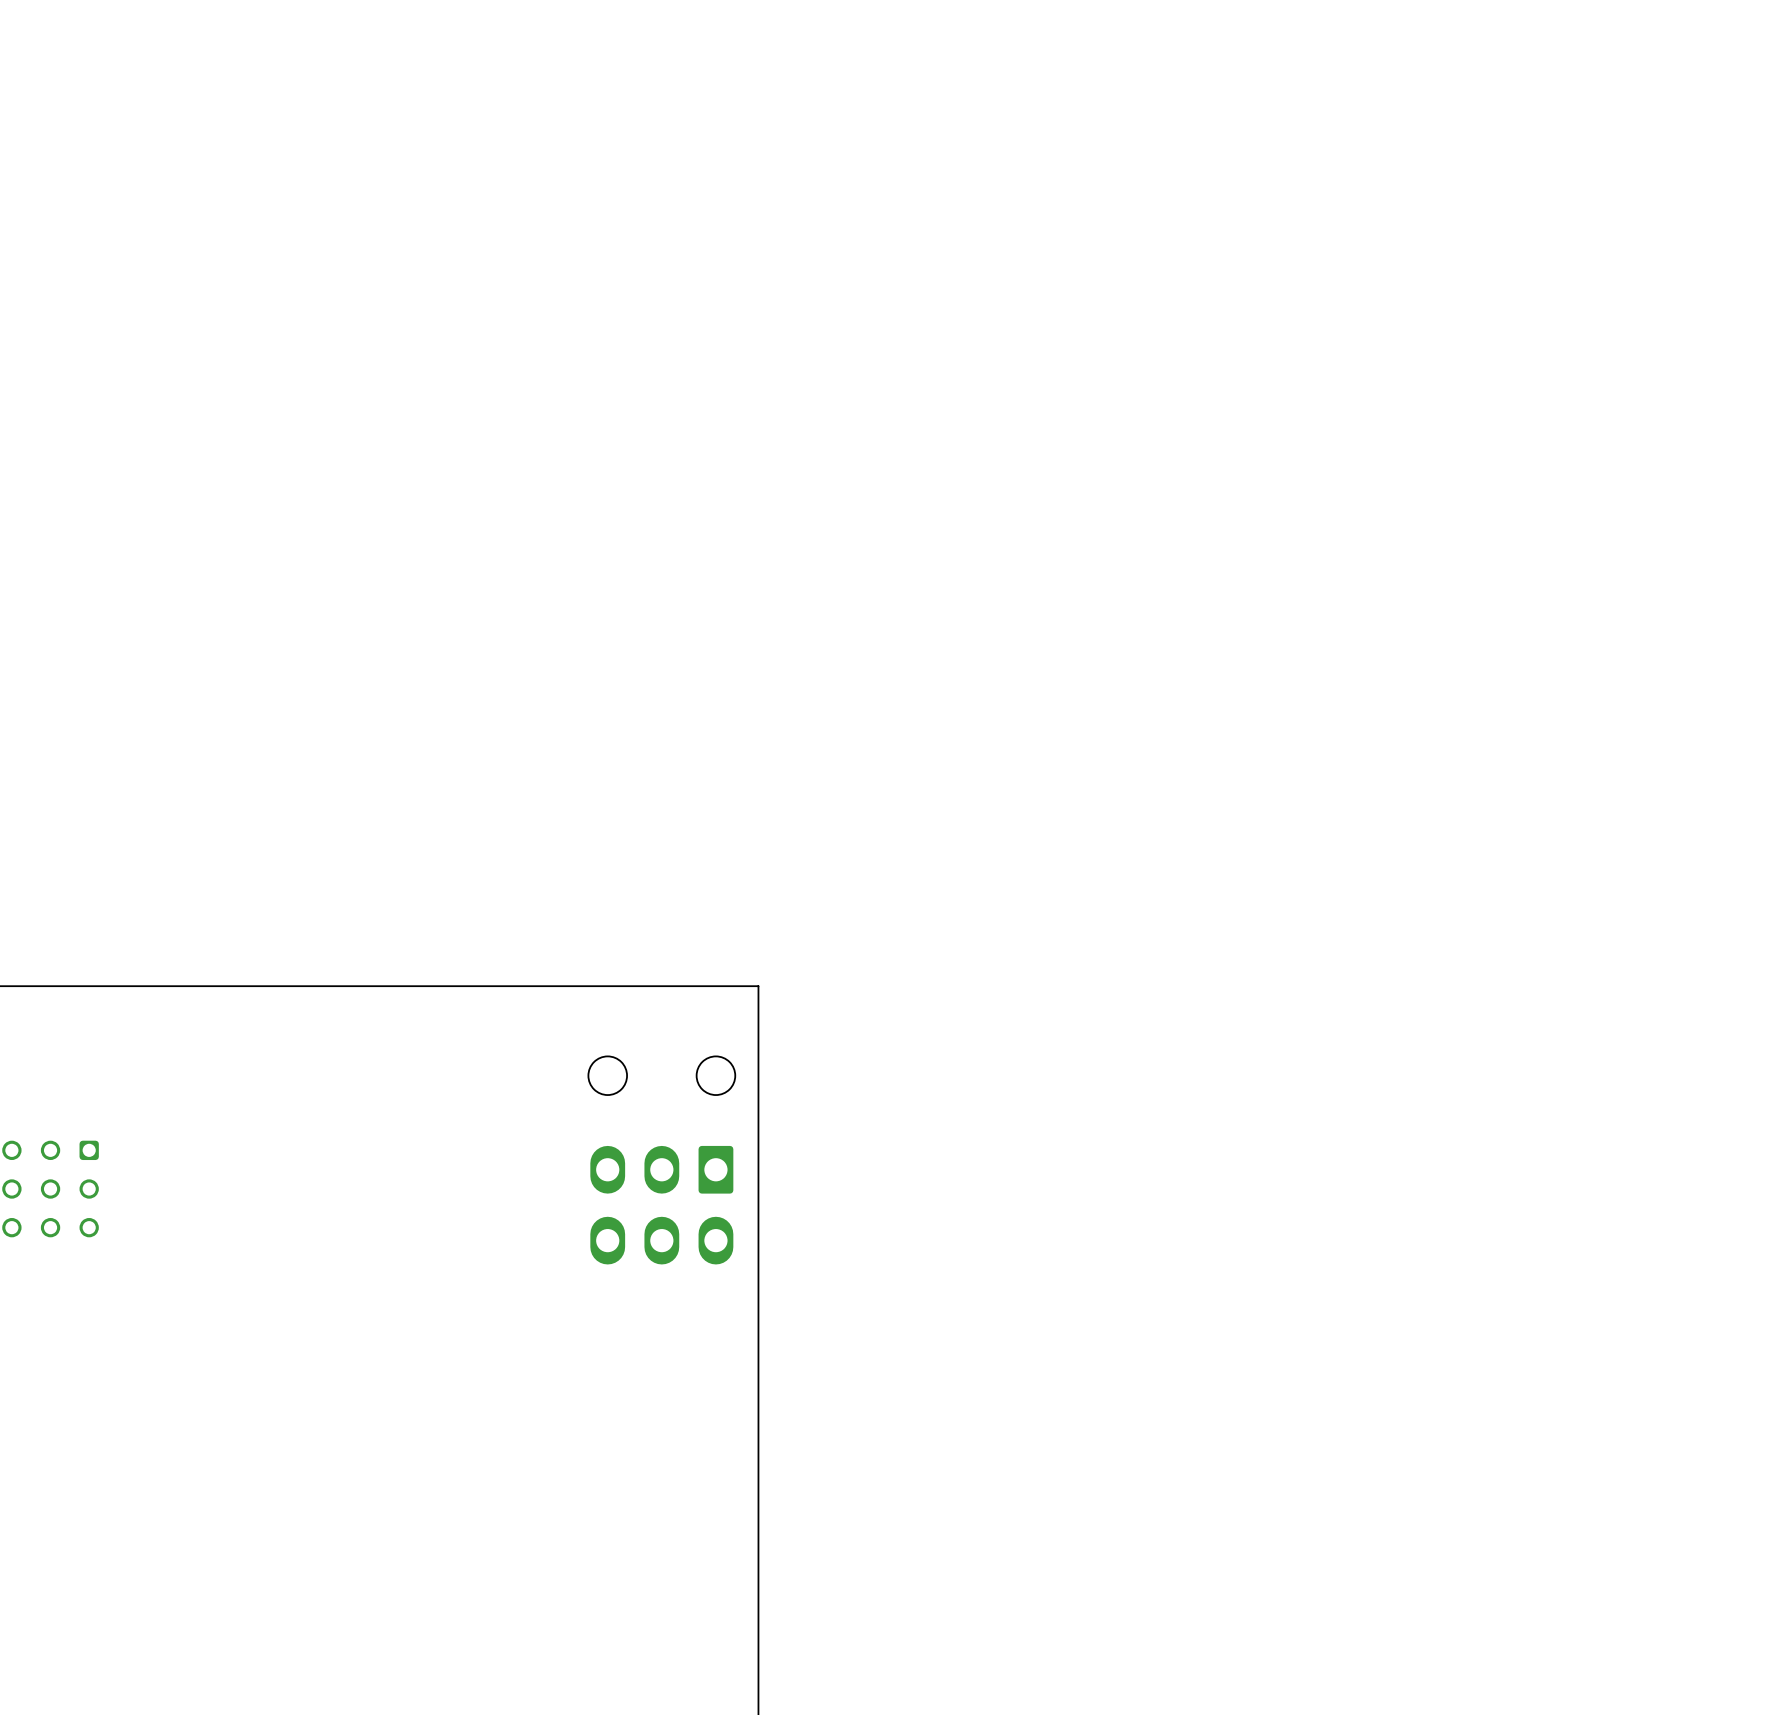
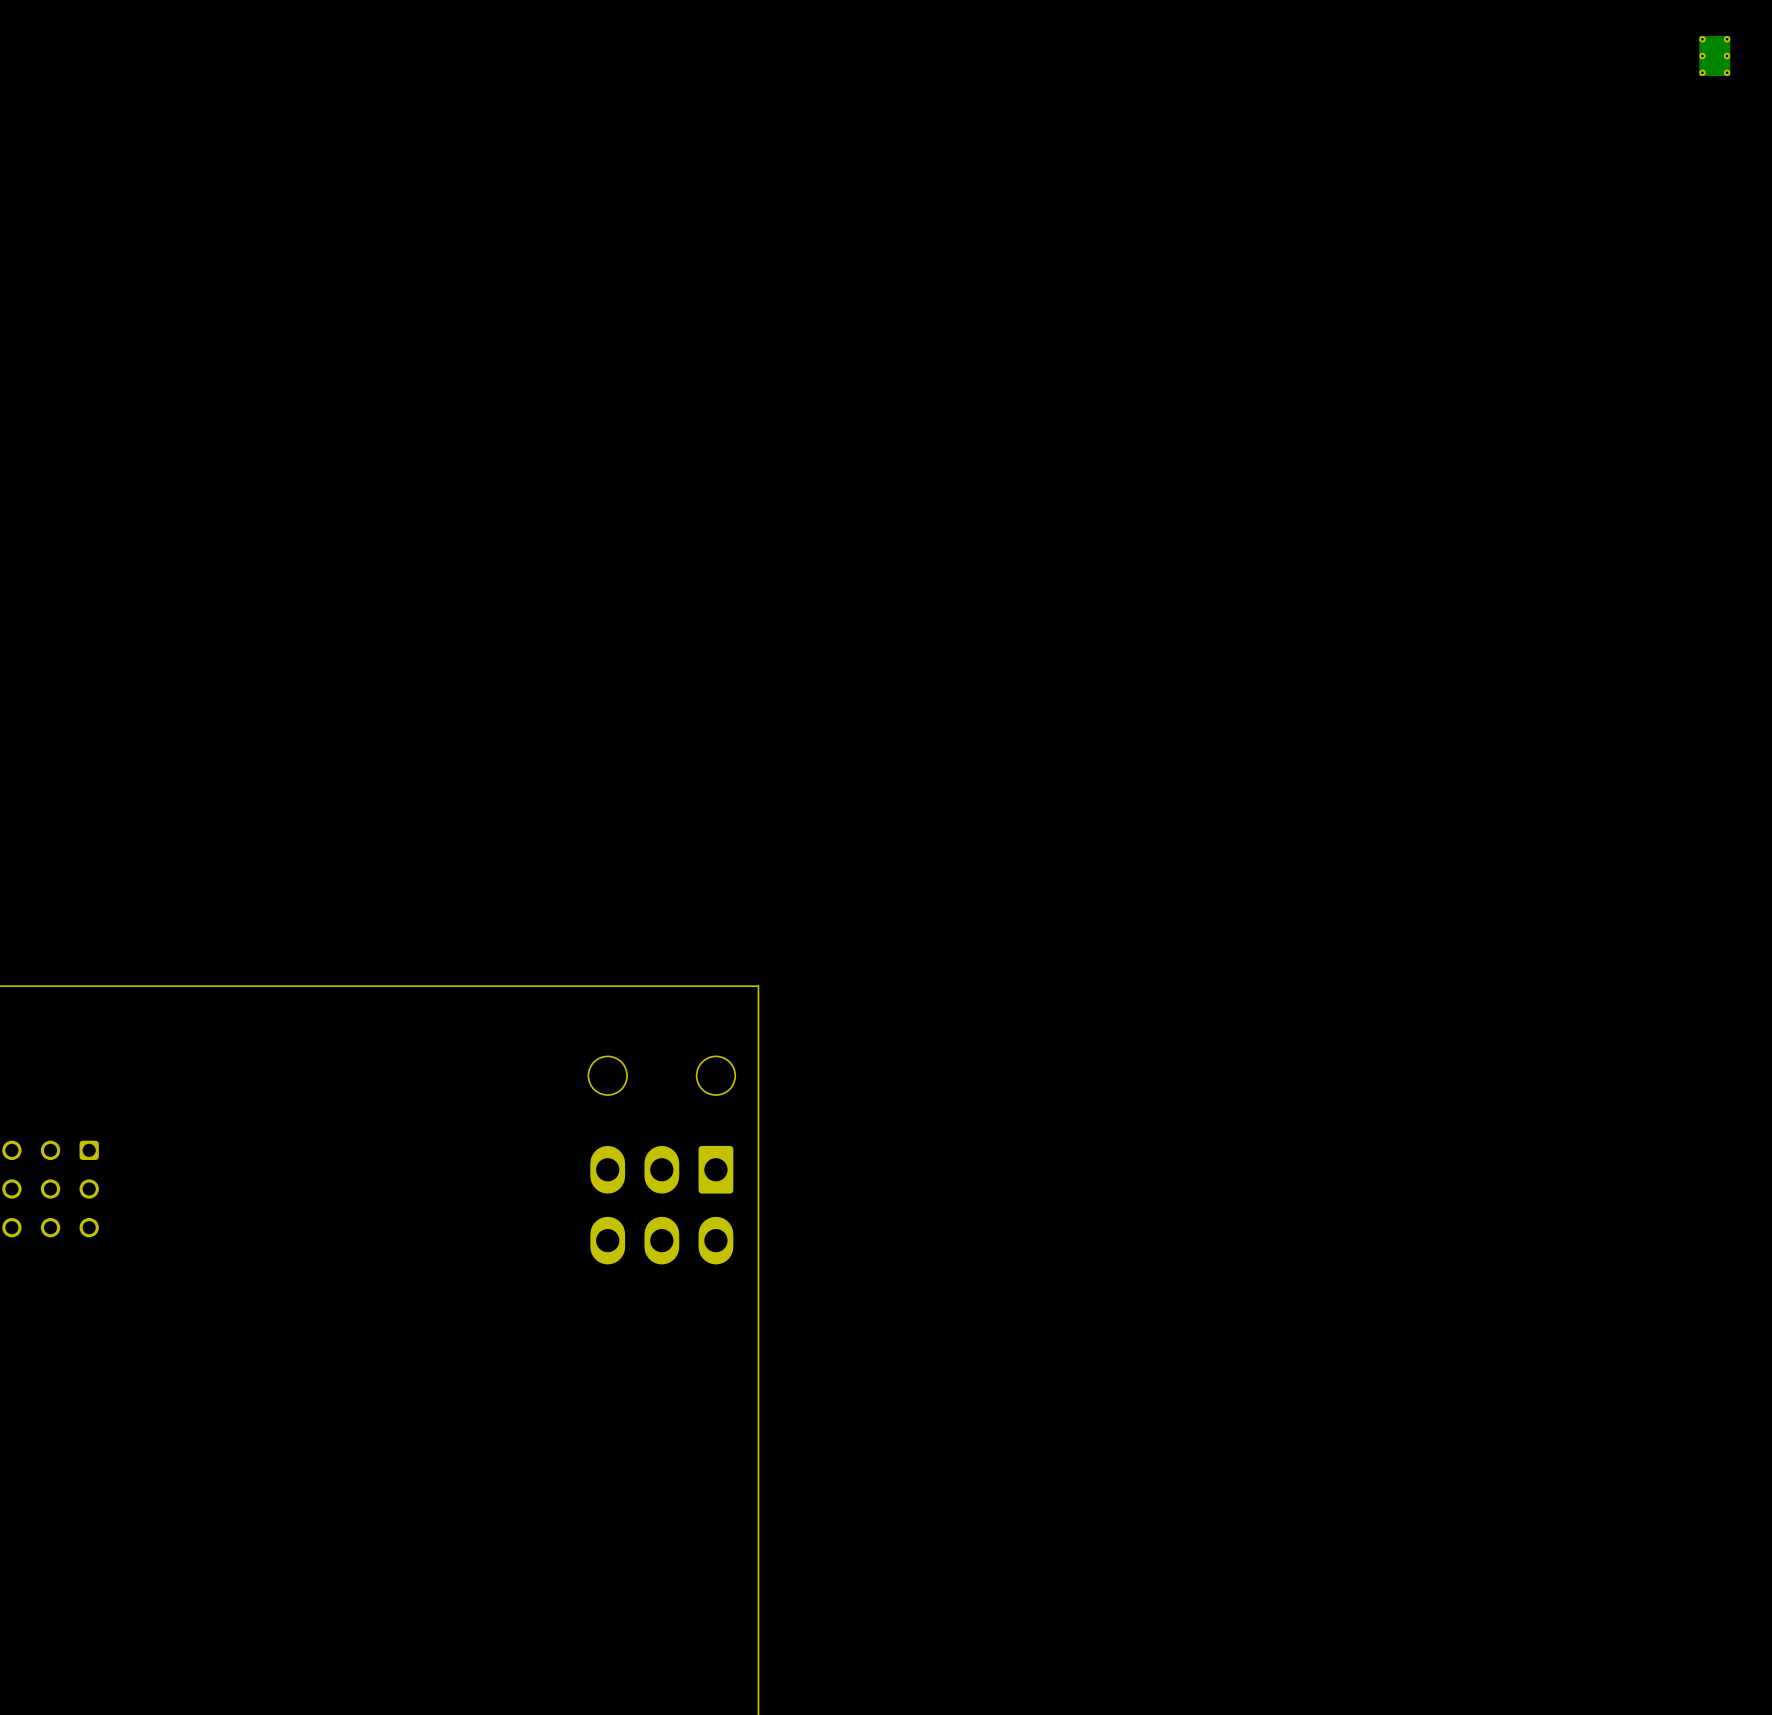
part: none -> (1714, 56)

